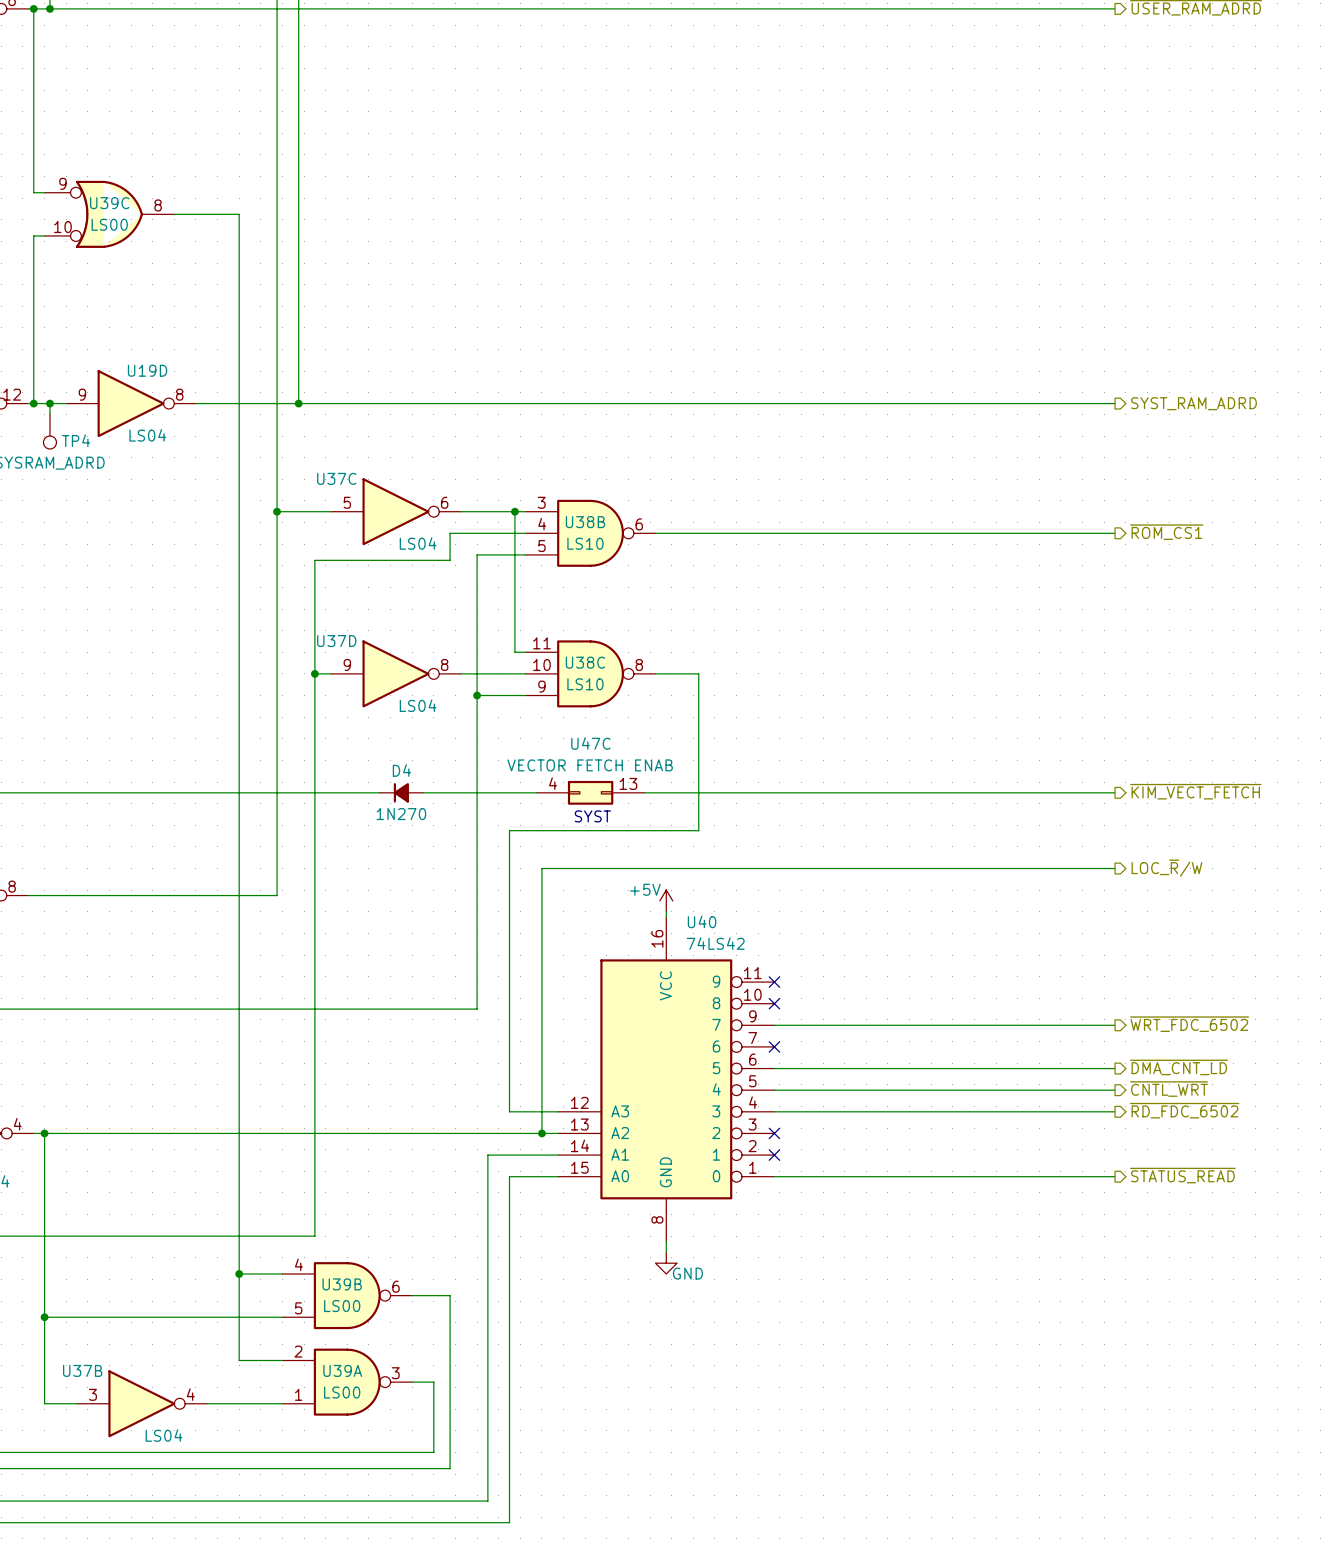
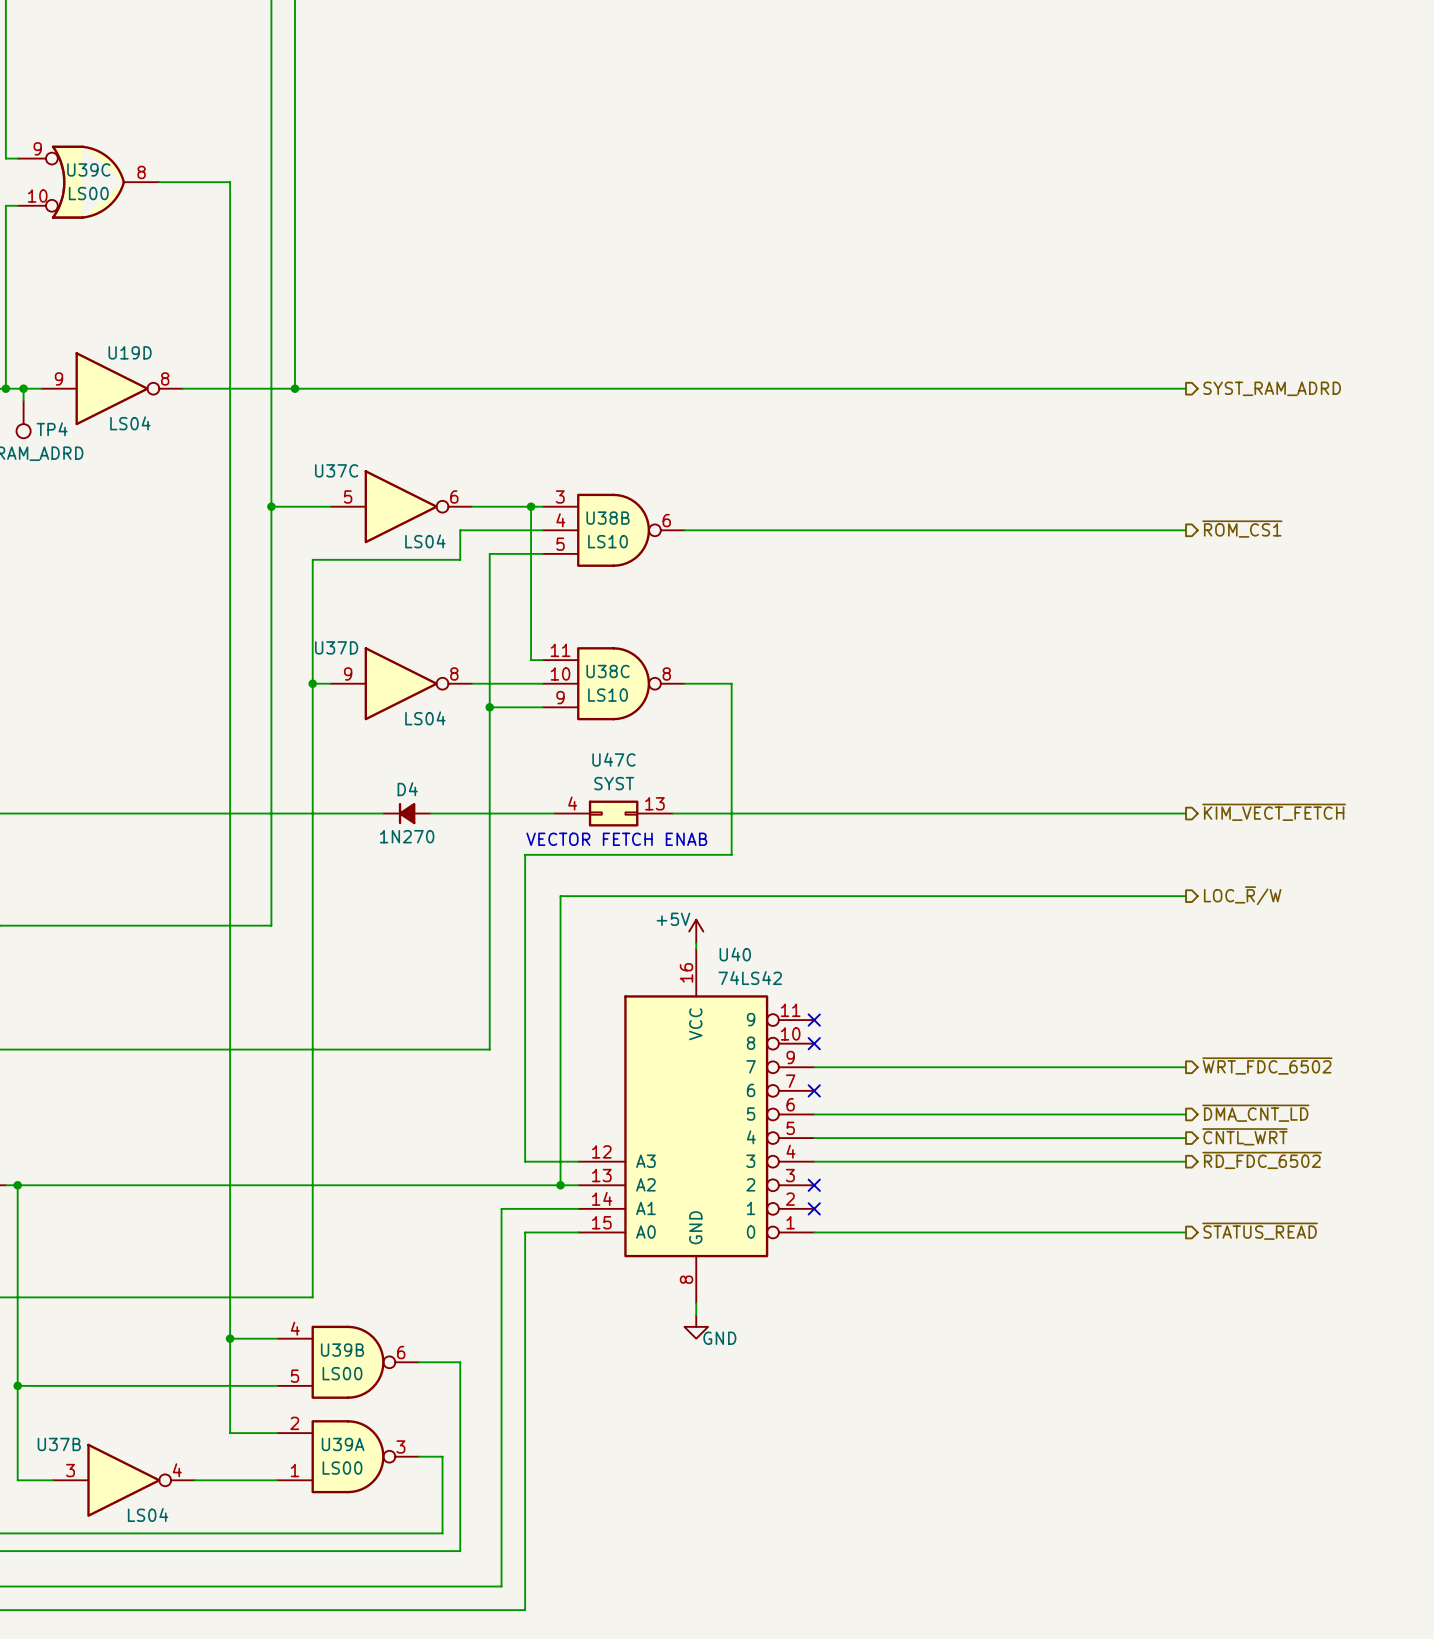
U47C value: VECTOR FETCH ENAB (590, 765) -> SYST (614, 783)
text: SYST (592, 816) -> none
text: none -> VECTOR FETCH ENAB (616, 839)

